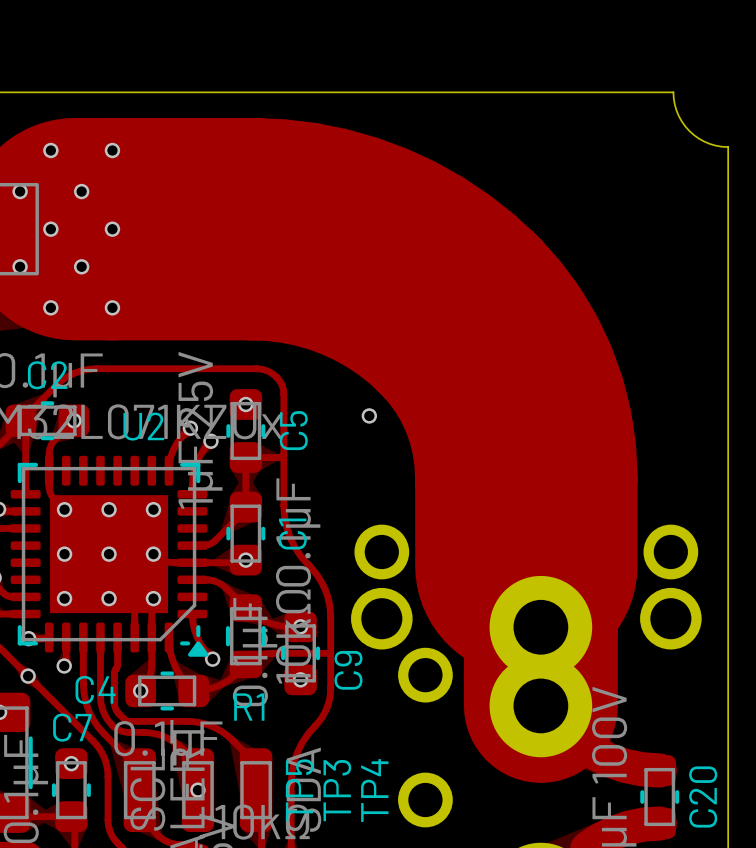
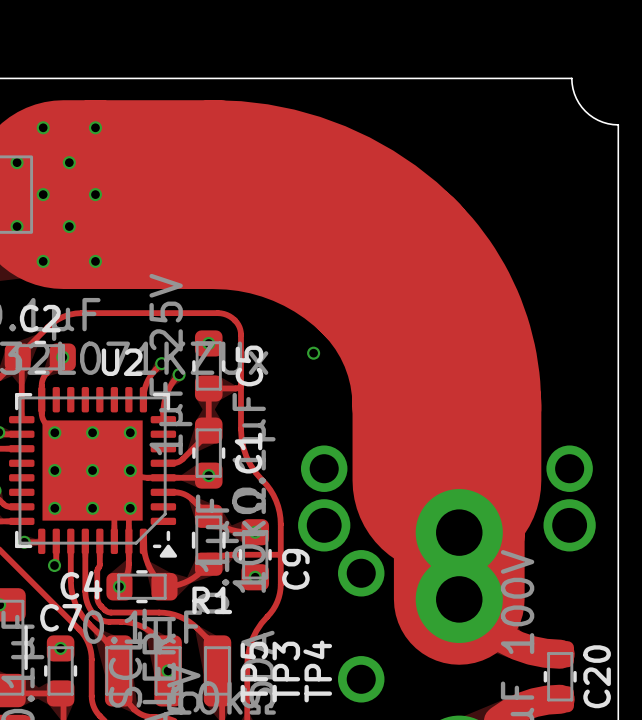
track: (192, 614) (196, 636) (212, 659) -> none
via: (212, 659) -> none
via: (28, 676) -> none

